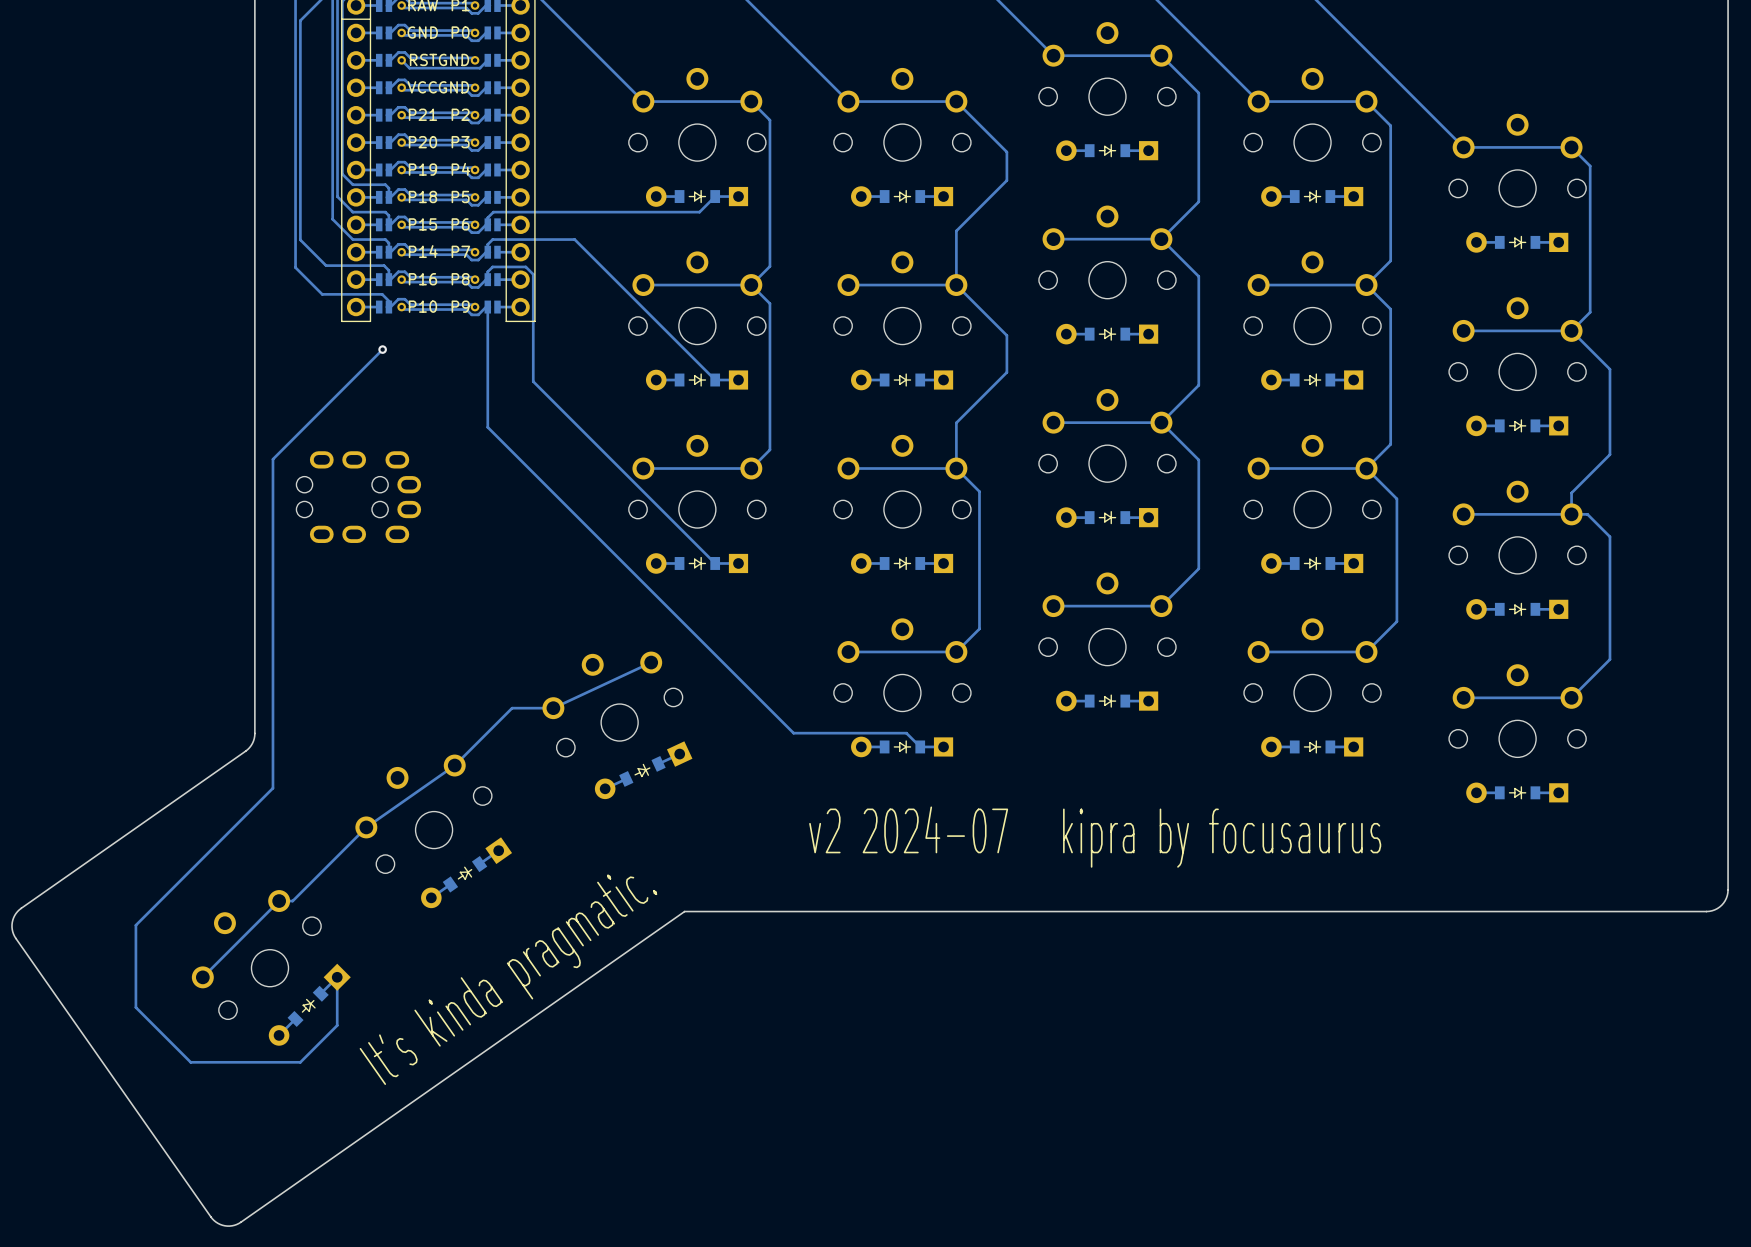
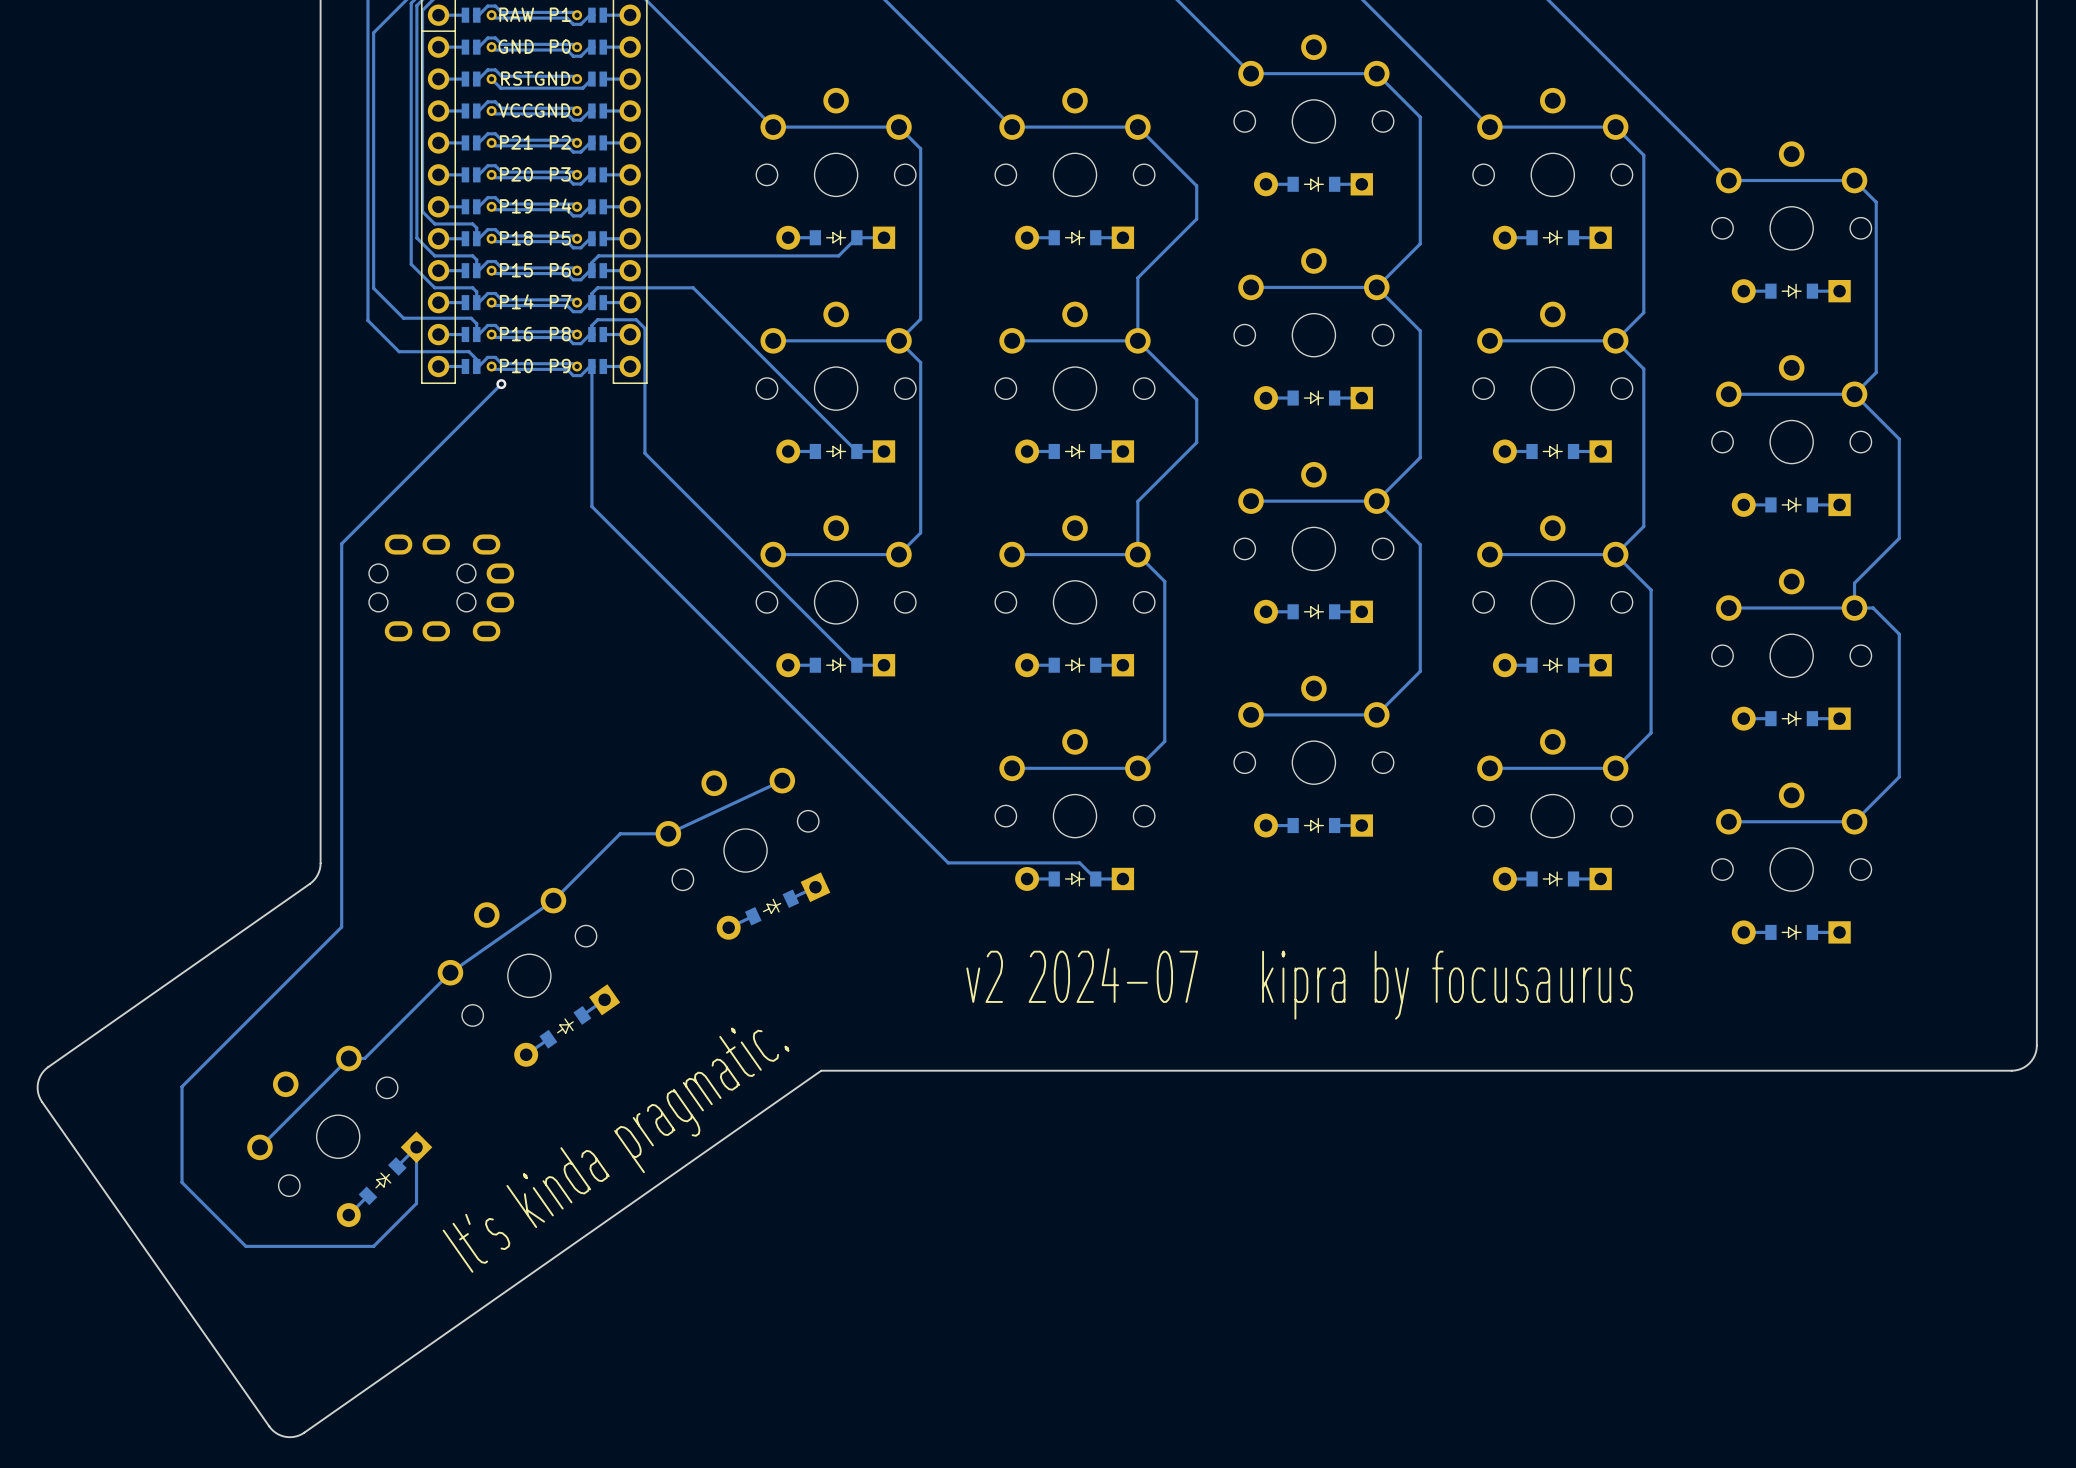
track: none -> (501, 384) (469, 416)
via position: (382, 349) -> (501, 384)

